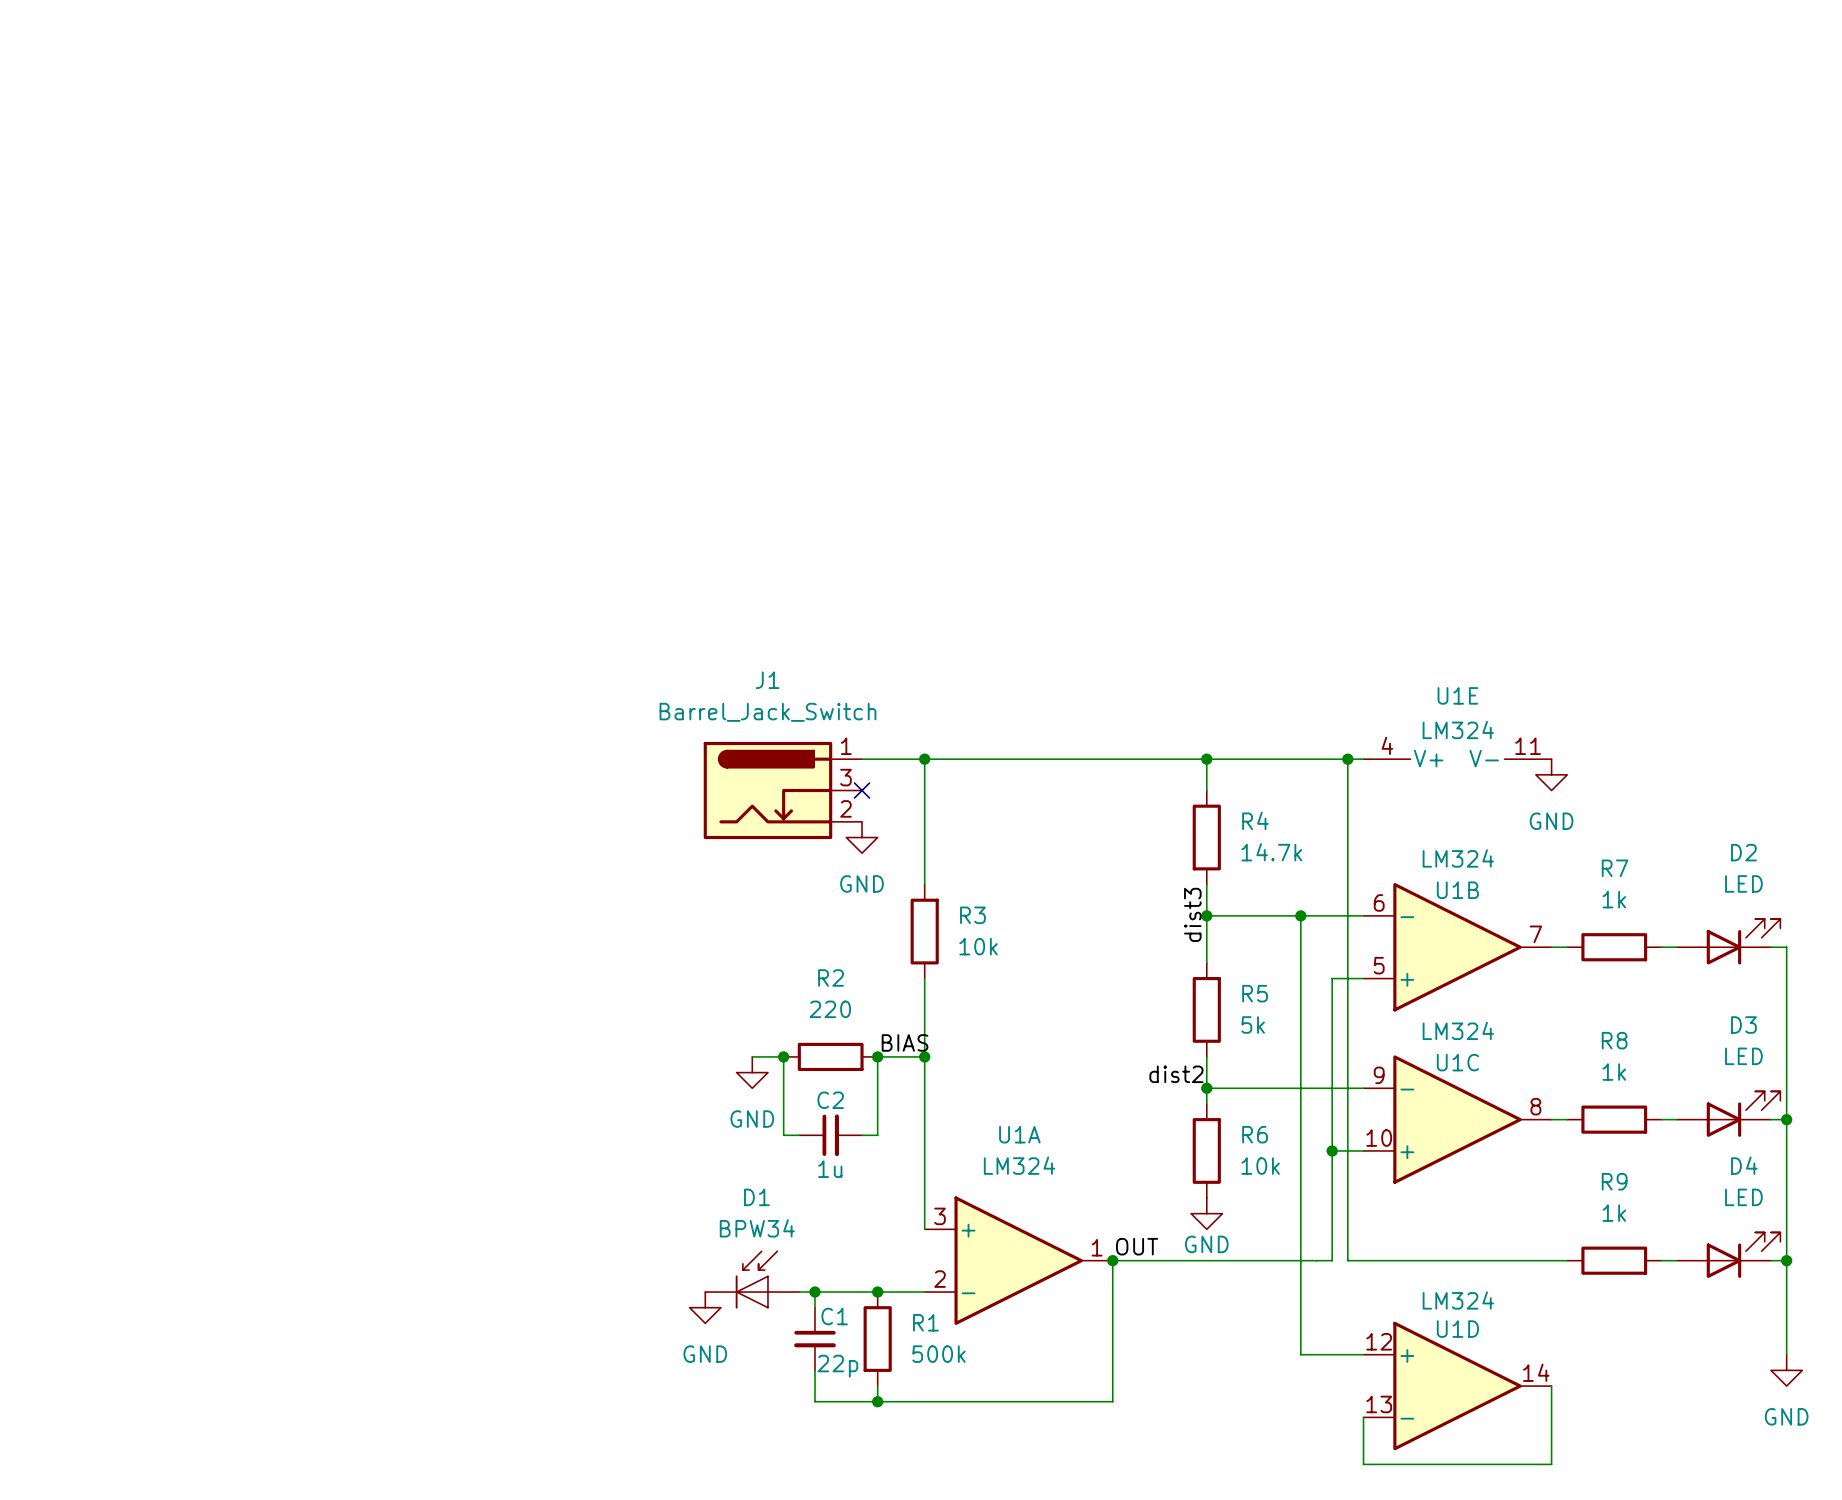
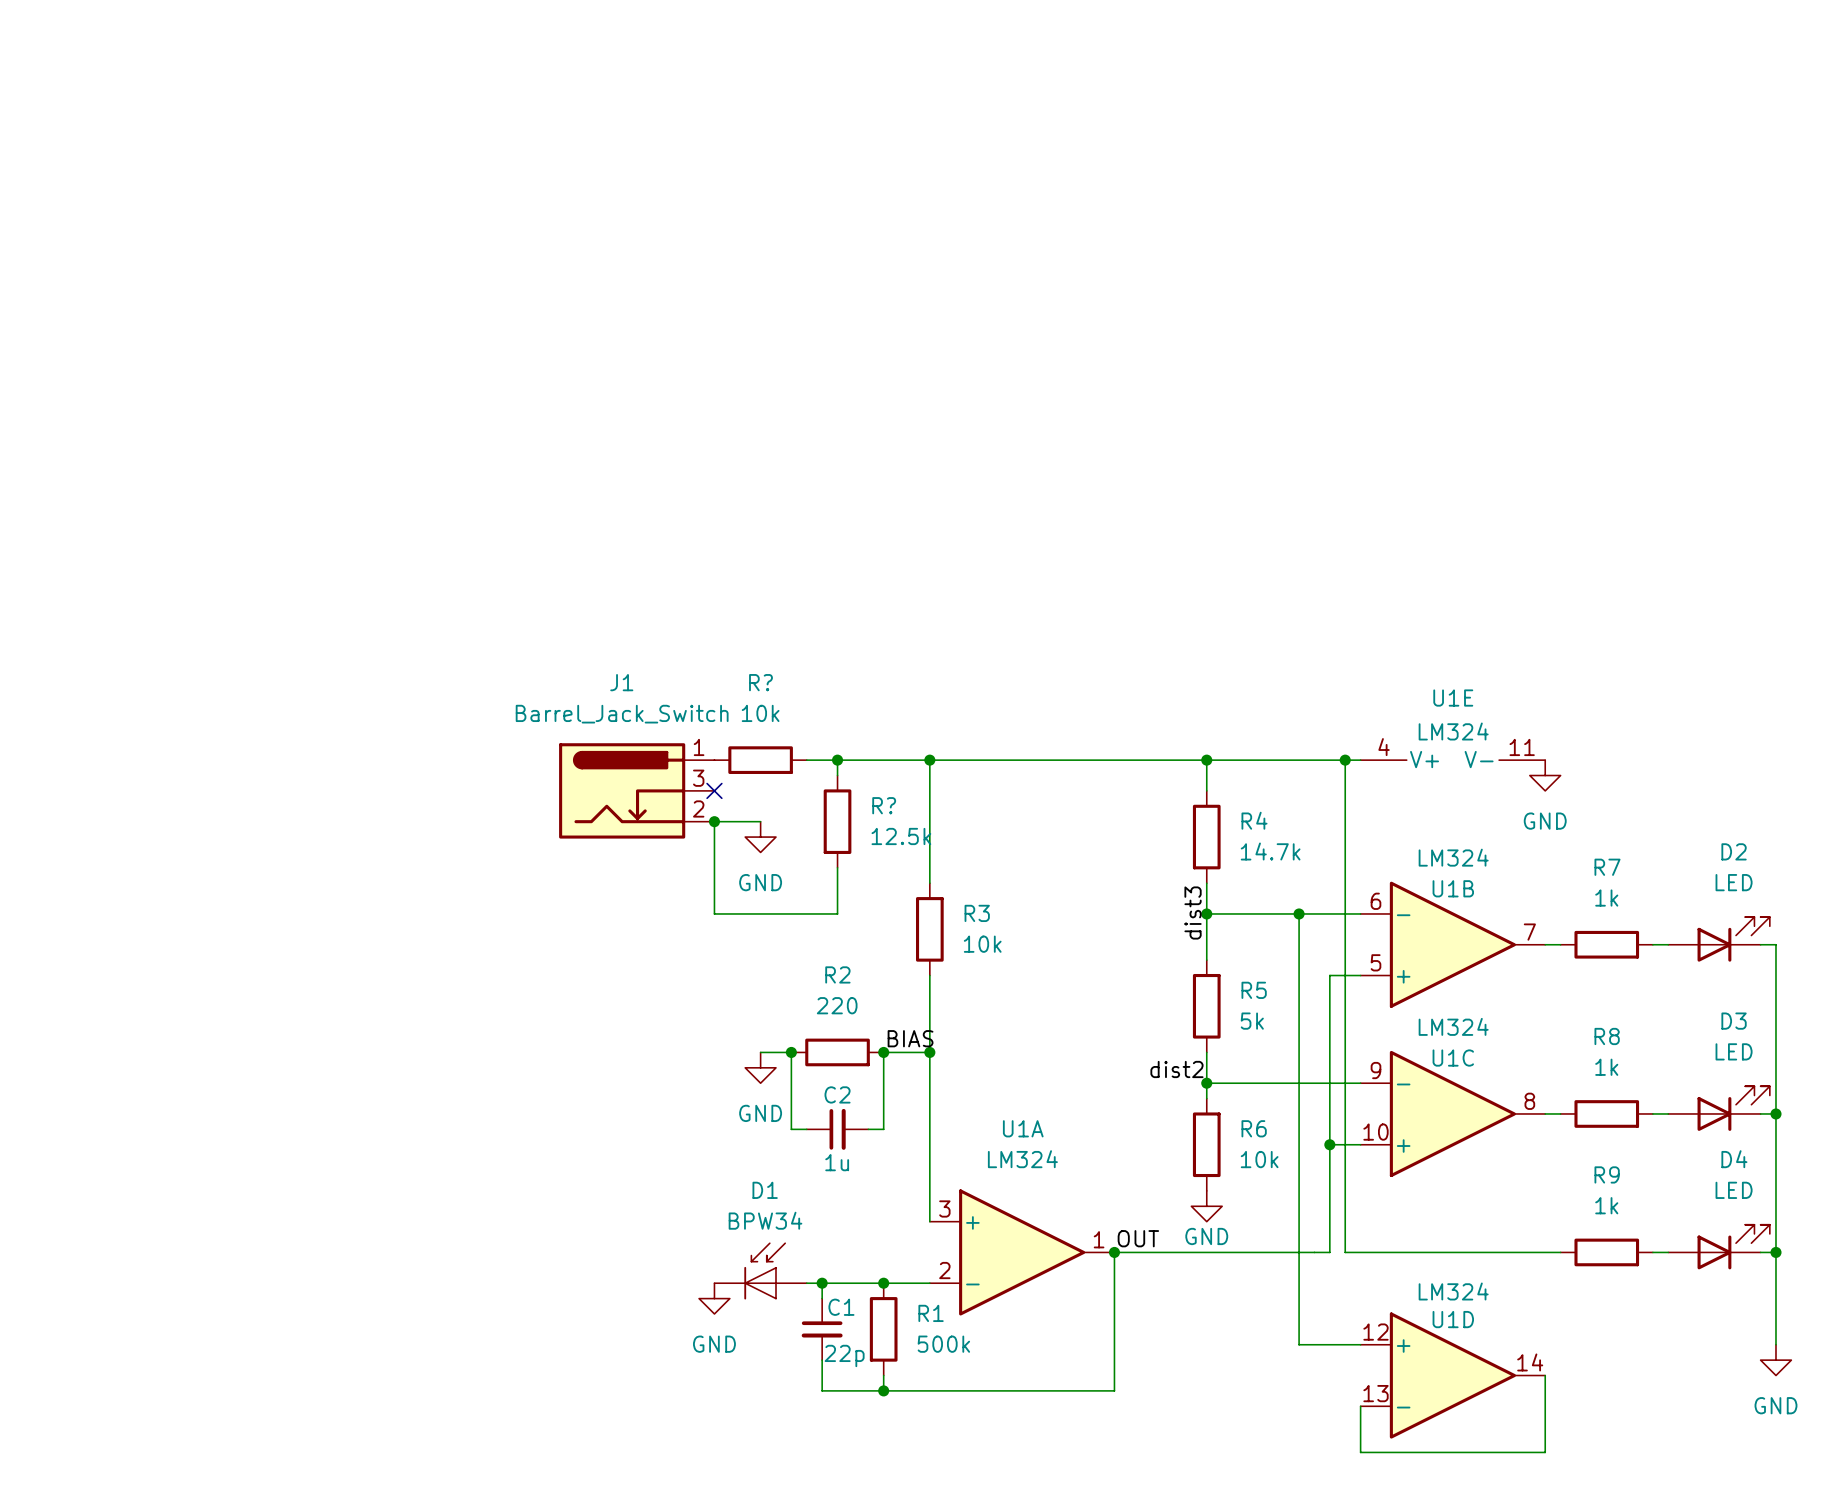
R?: none -> 10k (760, 760)
junction: none -> (837, 760)
no-connect mark: none -> (714, 790)
J1 position: (782, 790) -> (636, 790)
no-connect mark: (862, 790) -> none
junction: none -> (714, 821)
wire: none -> (760, 821) (714, 821) (714, 913) (837, 913) (837, 867)
R?: none -> 12.5k (837, 821)
power symbol position: GND (862, 837) -> GND (760, 837)

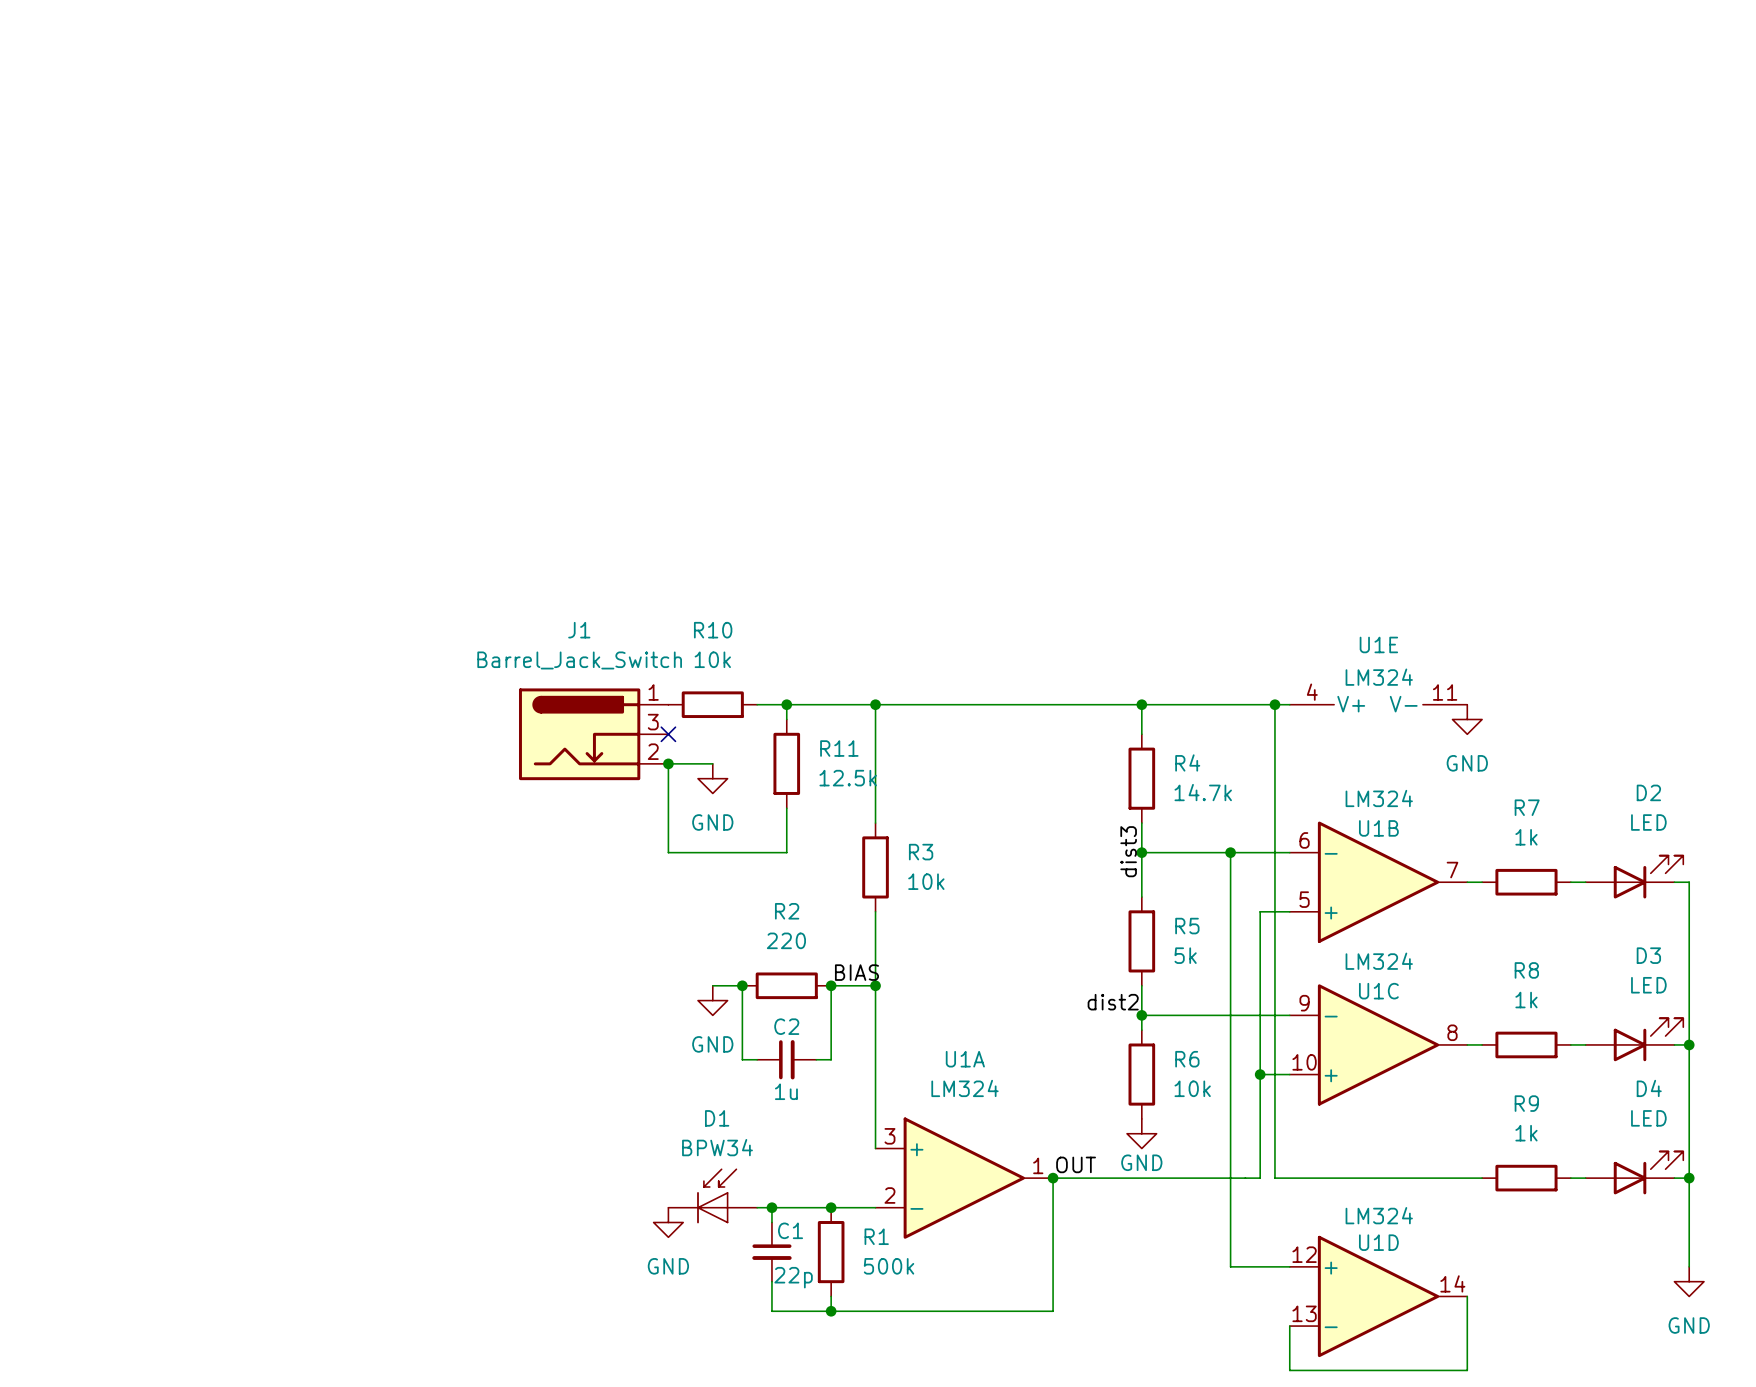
R? name: R? (760, 682) -> R10 (713, 630)
R? name: R? (884, 805) -> R11 (839, 748)

